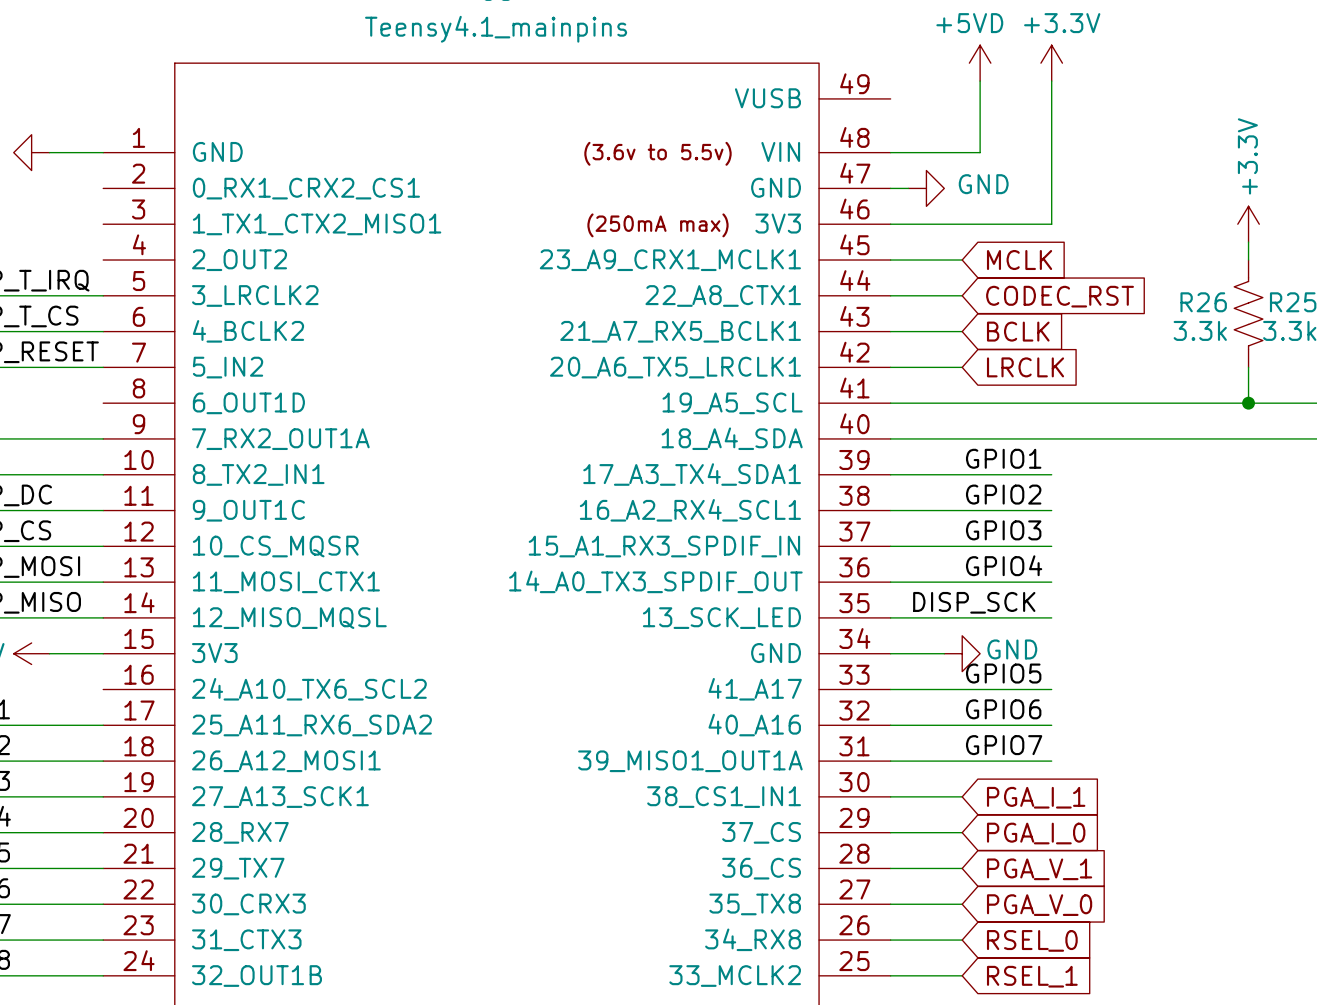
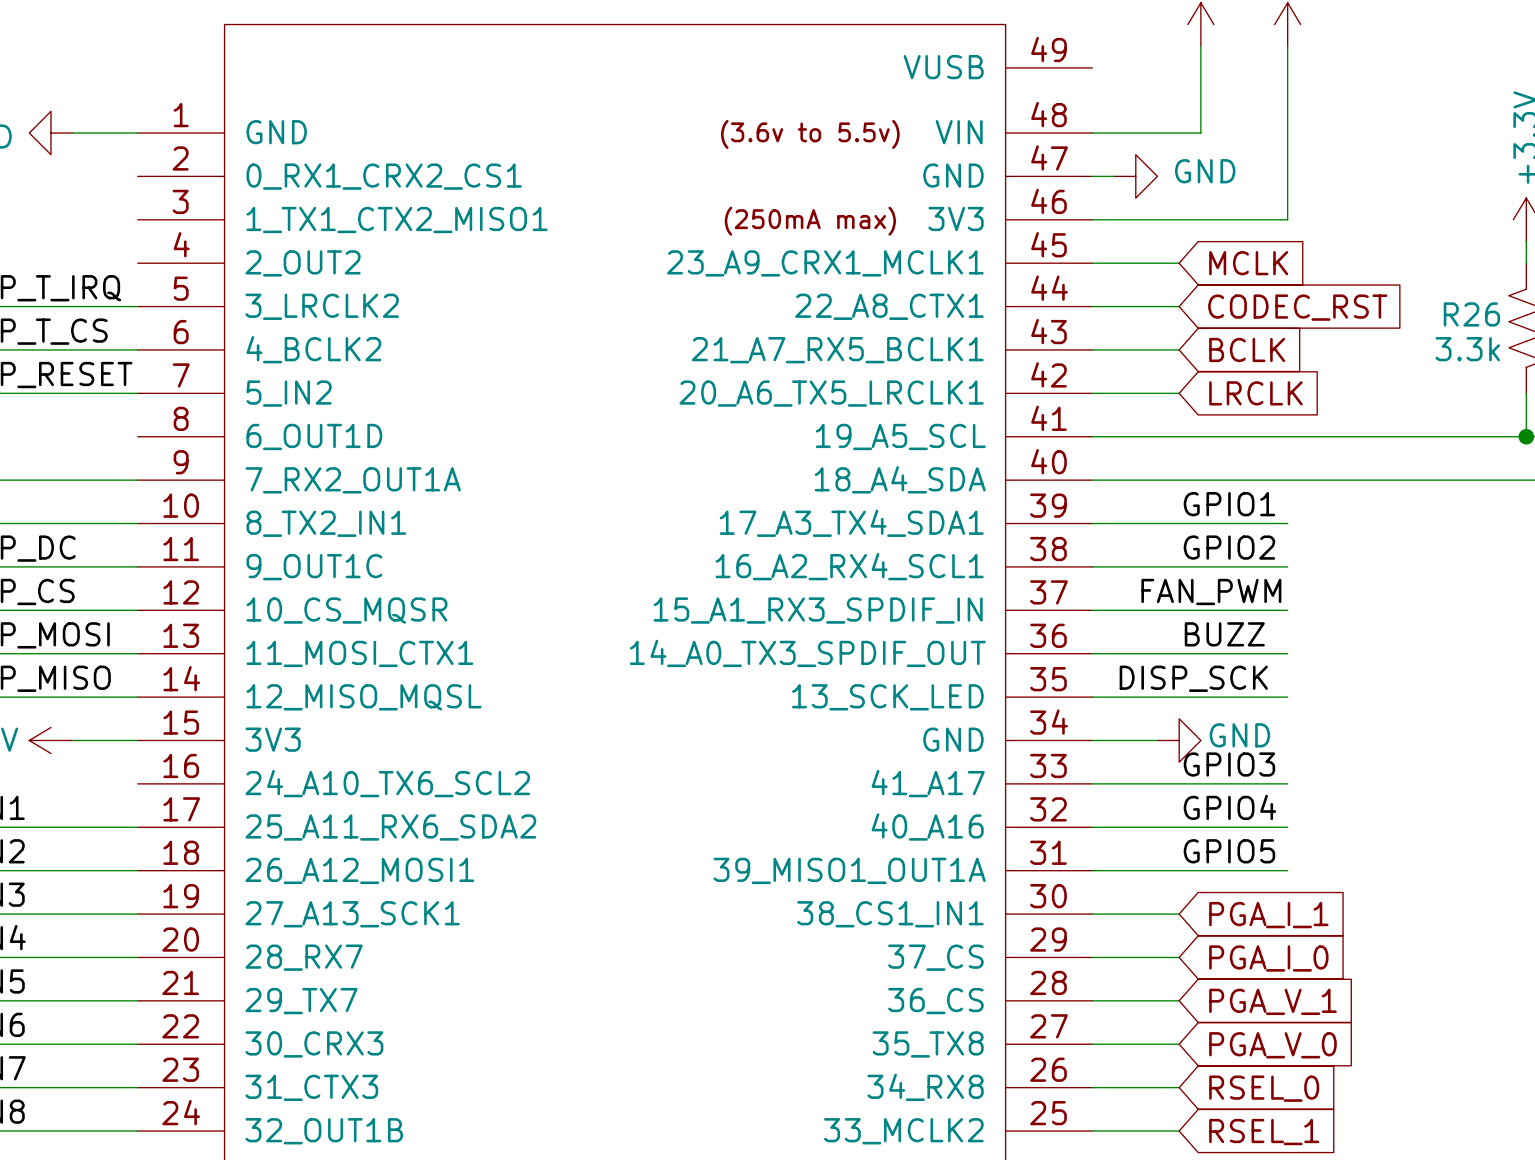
label: GPIO3 (1003, 530) -> none
label: none -> FAN_PWM (1211, 591)
label: GPIO4 (1004, 565) -> BUZZ (1224, 634)
label: GPIO5 (1003, 673) -> GPIO3 (1229, 764)
label: GPIO6 (1003, 709) -> GPIO4 (1229, 807)
label: GPIO7 (1004, 745) -> GPIO5 (1229, 851)

